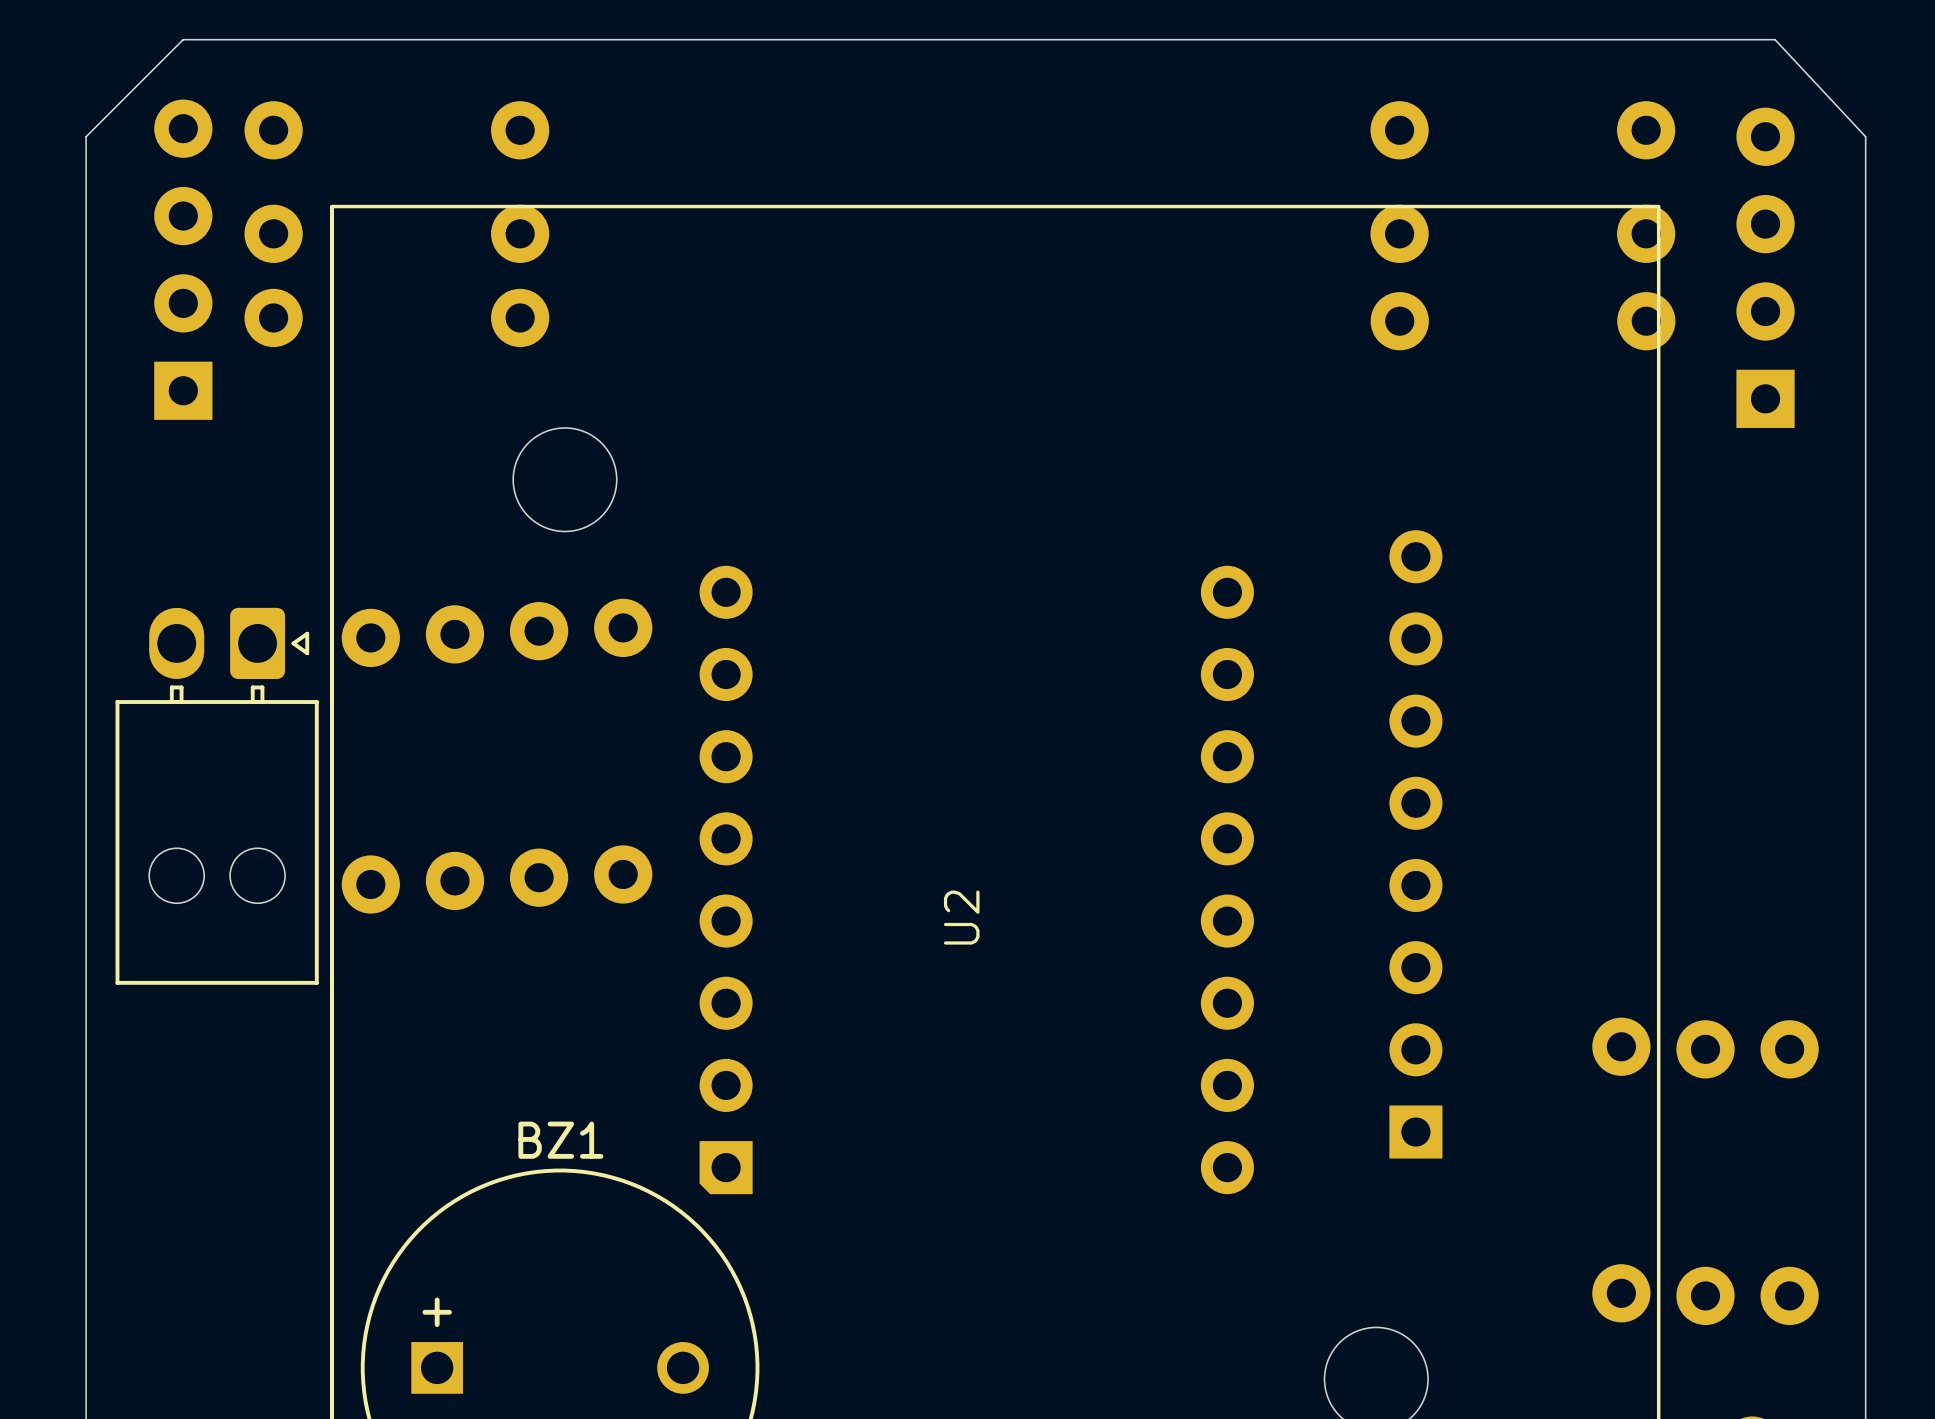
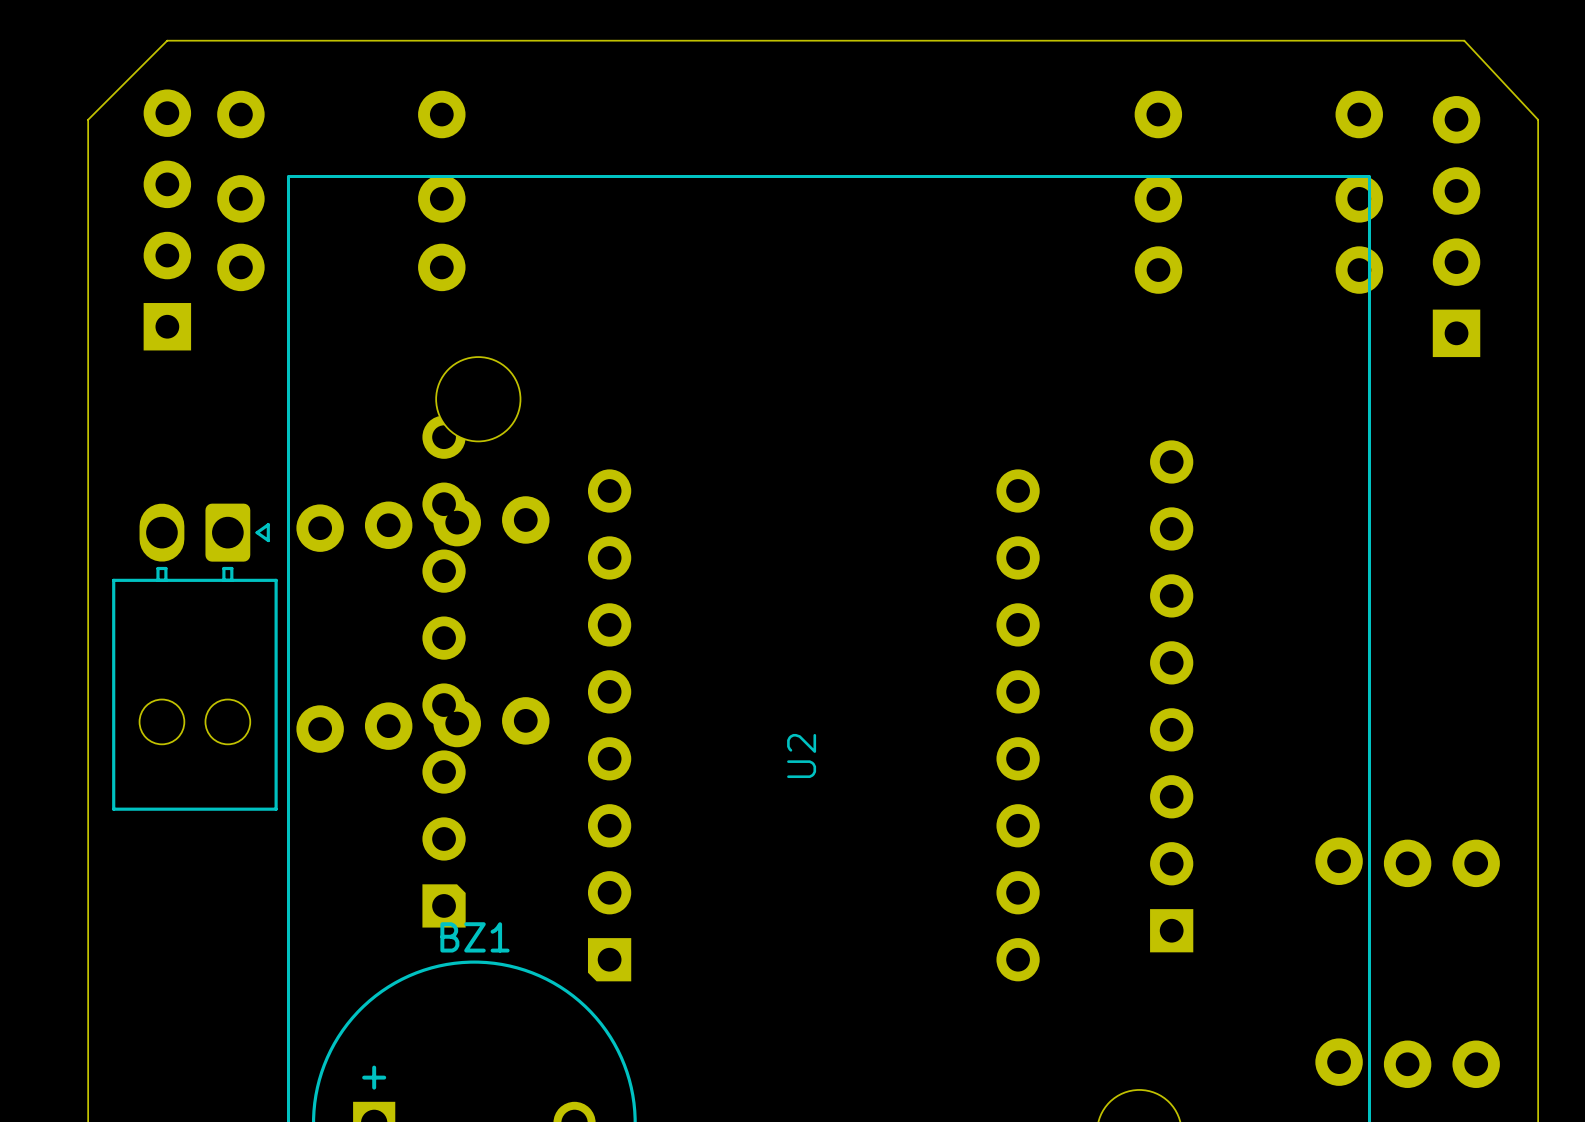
part: none -> (444, 671)

